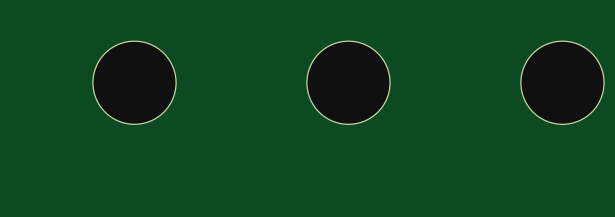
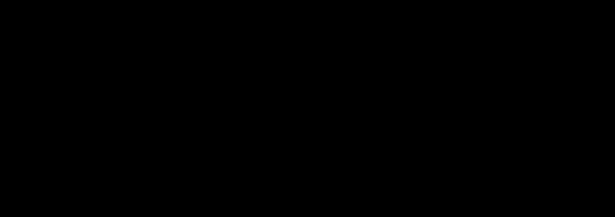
part: (134, 82) -> none
part: (348, 82) -> none
part: (562, 82) -> none

